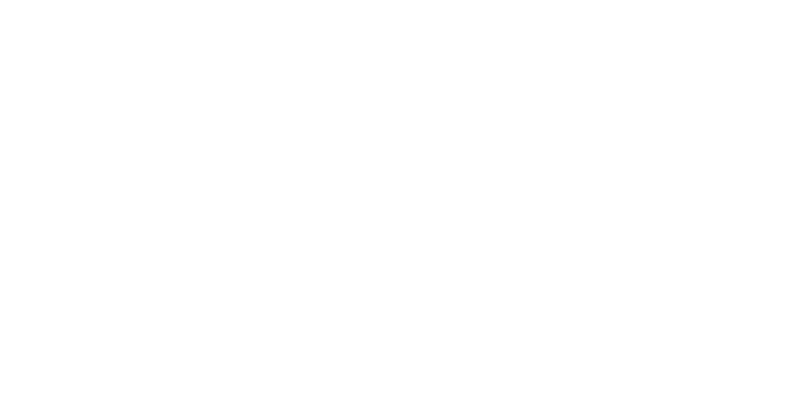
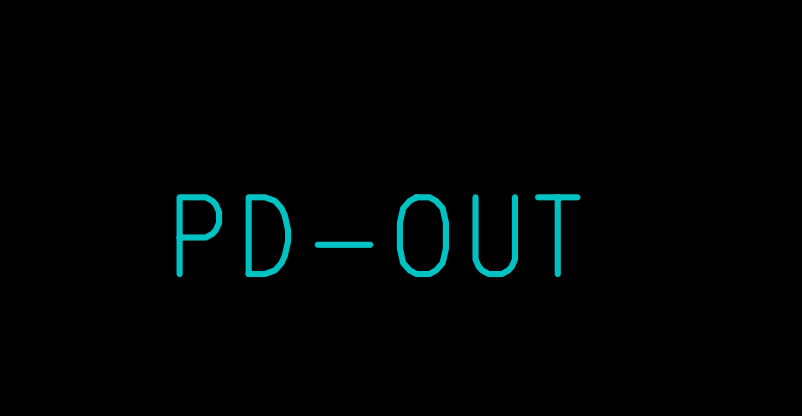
text: none -> PD-OUT (378, 235)

